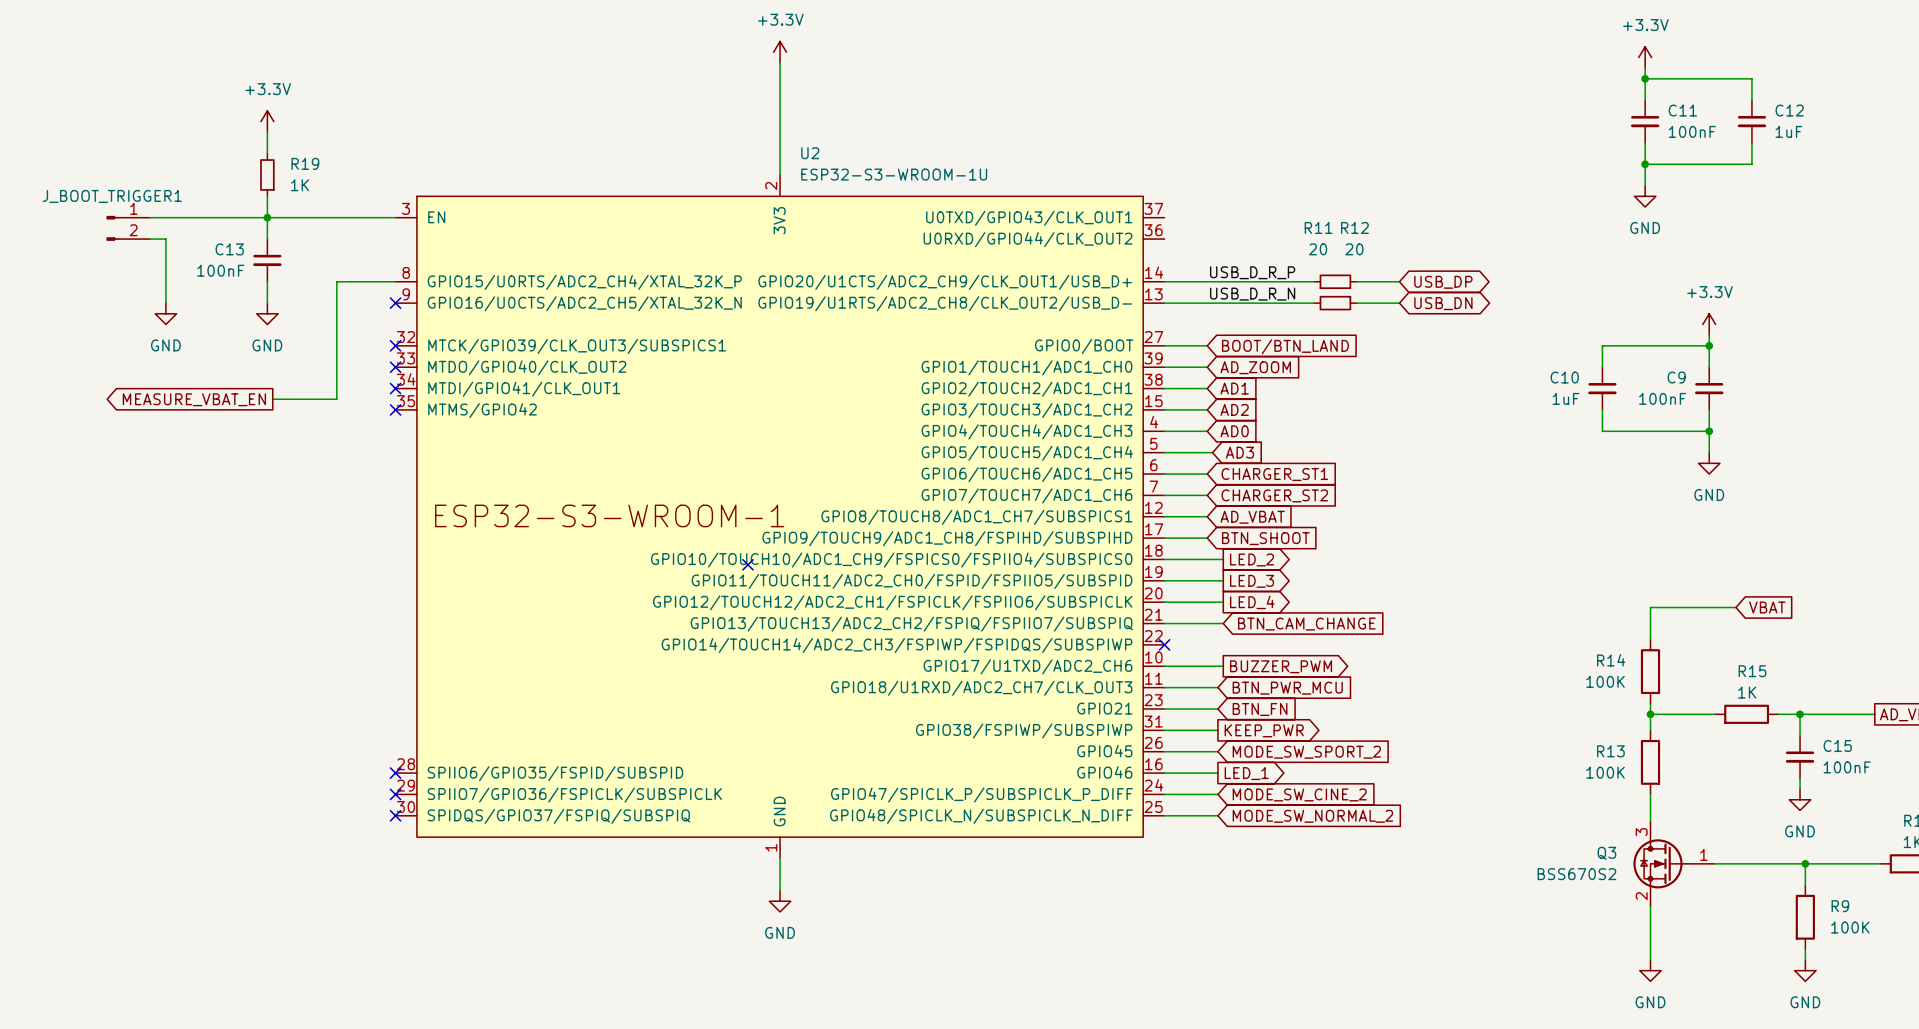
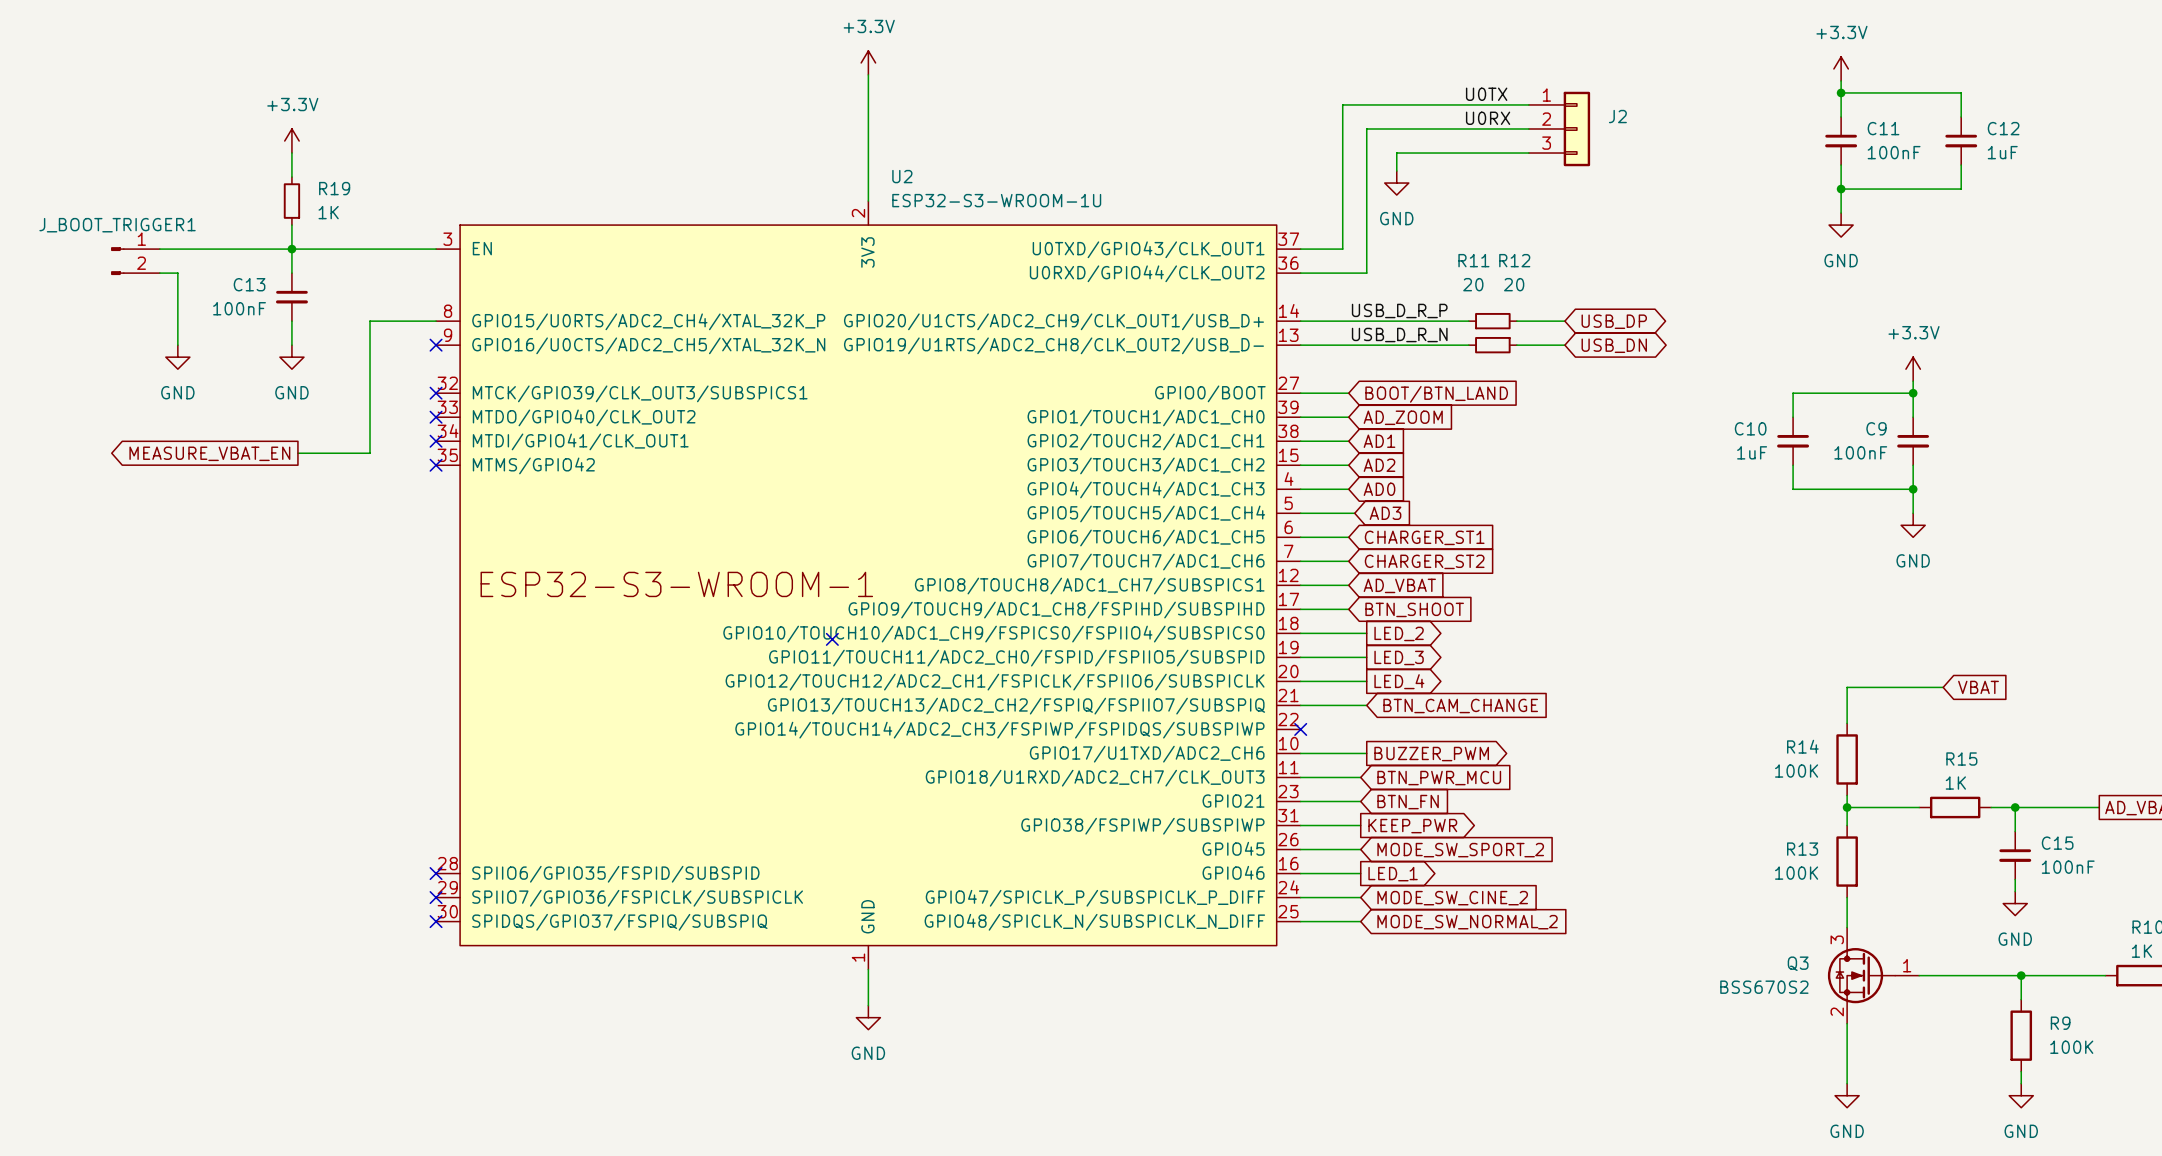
label: none -> U0TX (1486, 94)
wire: none -> (1528, 104) (1342, 104) (1342, 249) (1300, 249)
label: none -> U0RX (1488, 118)
wire: none -> (1528, 128) (1366, 128) (1366, 273) (1300, 273)
J2: none -> (1559, 128)
wire: none -> (1528, 153) (1396, 153) (1396, 171)
power symbol: none -> GND (1396, 183)

